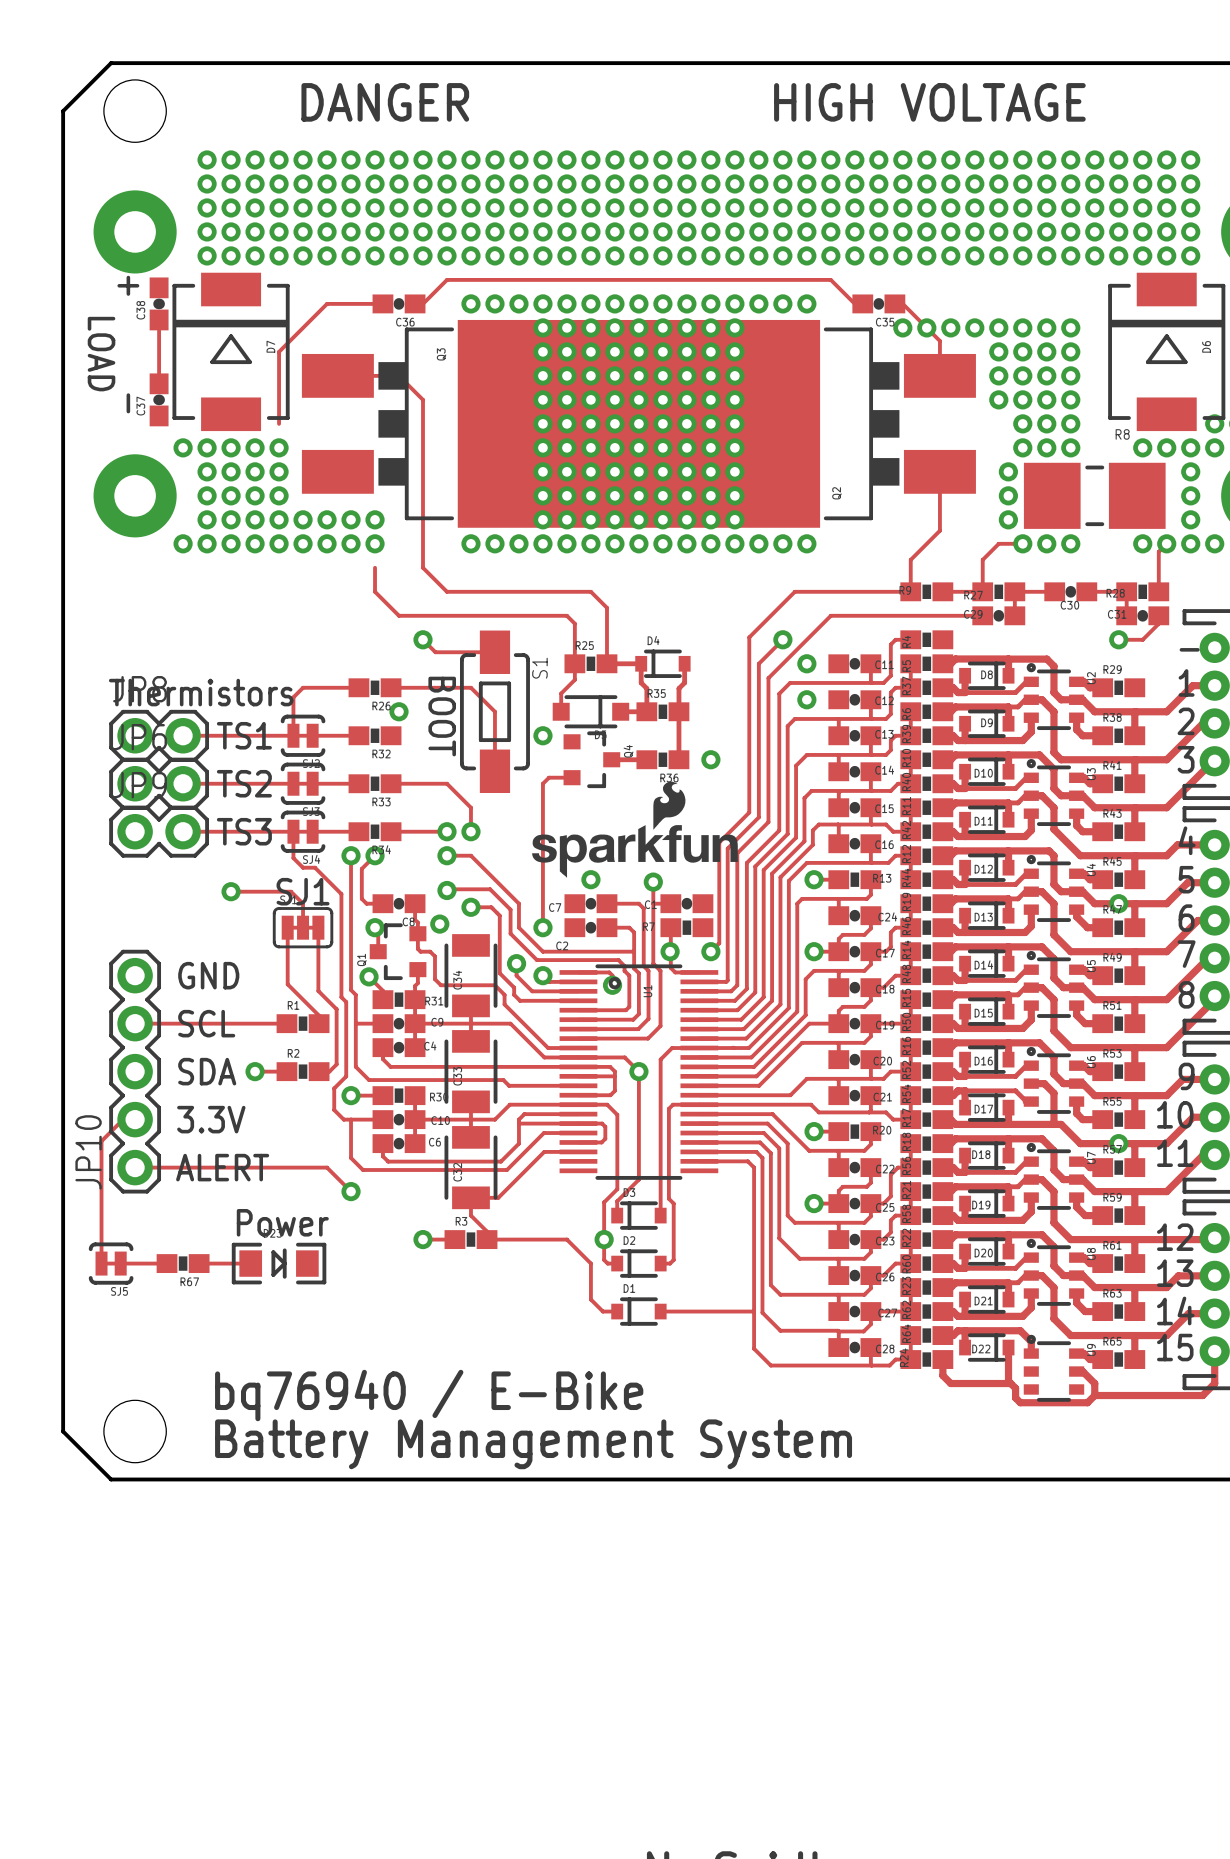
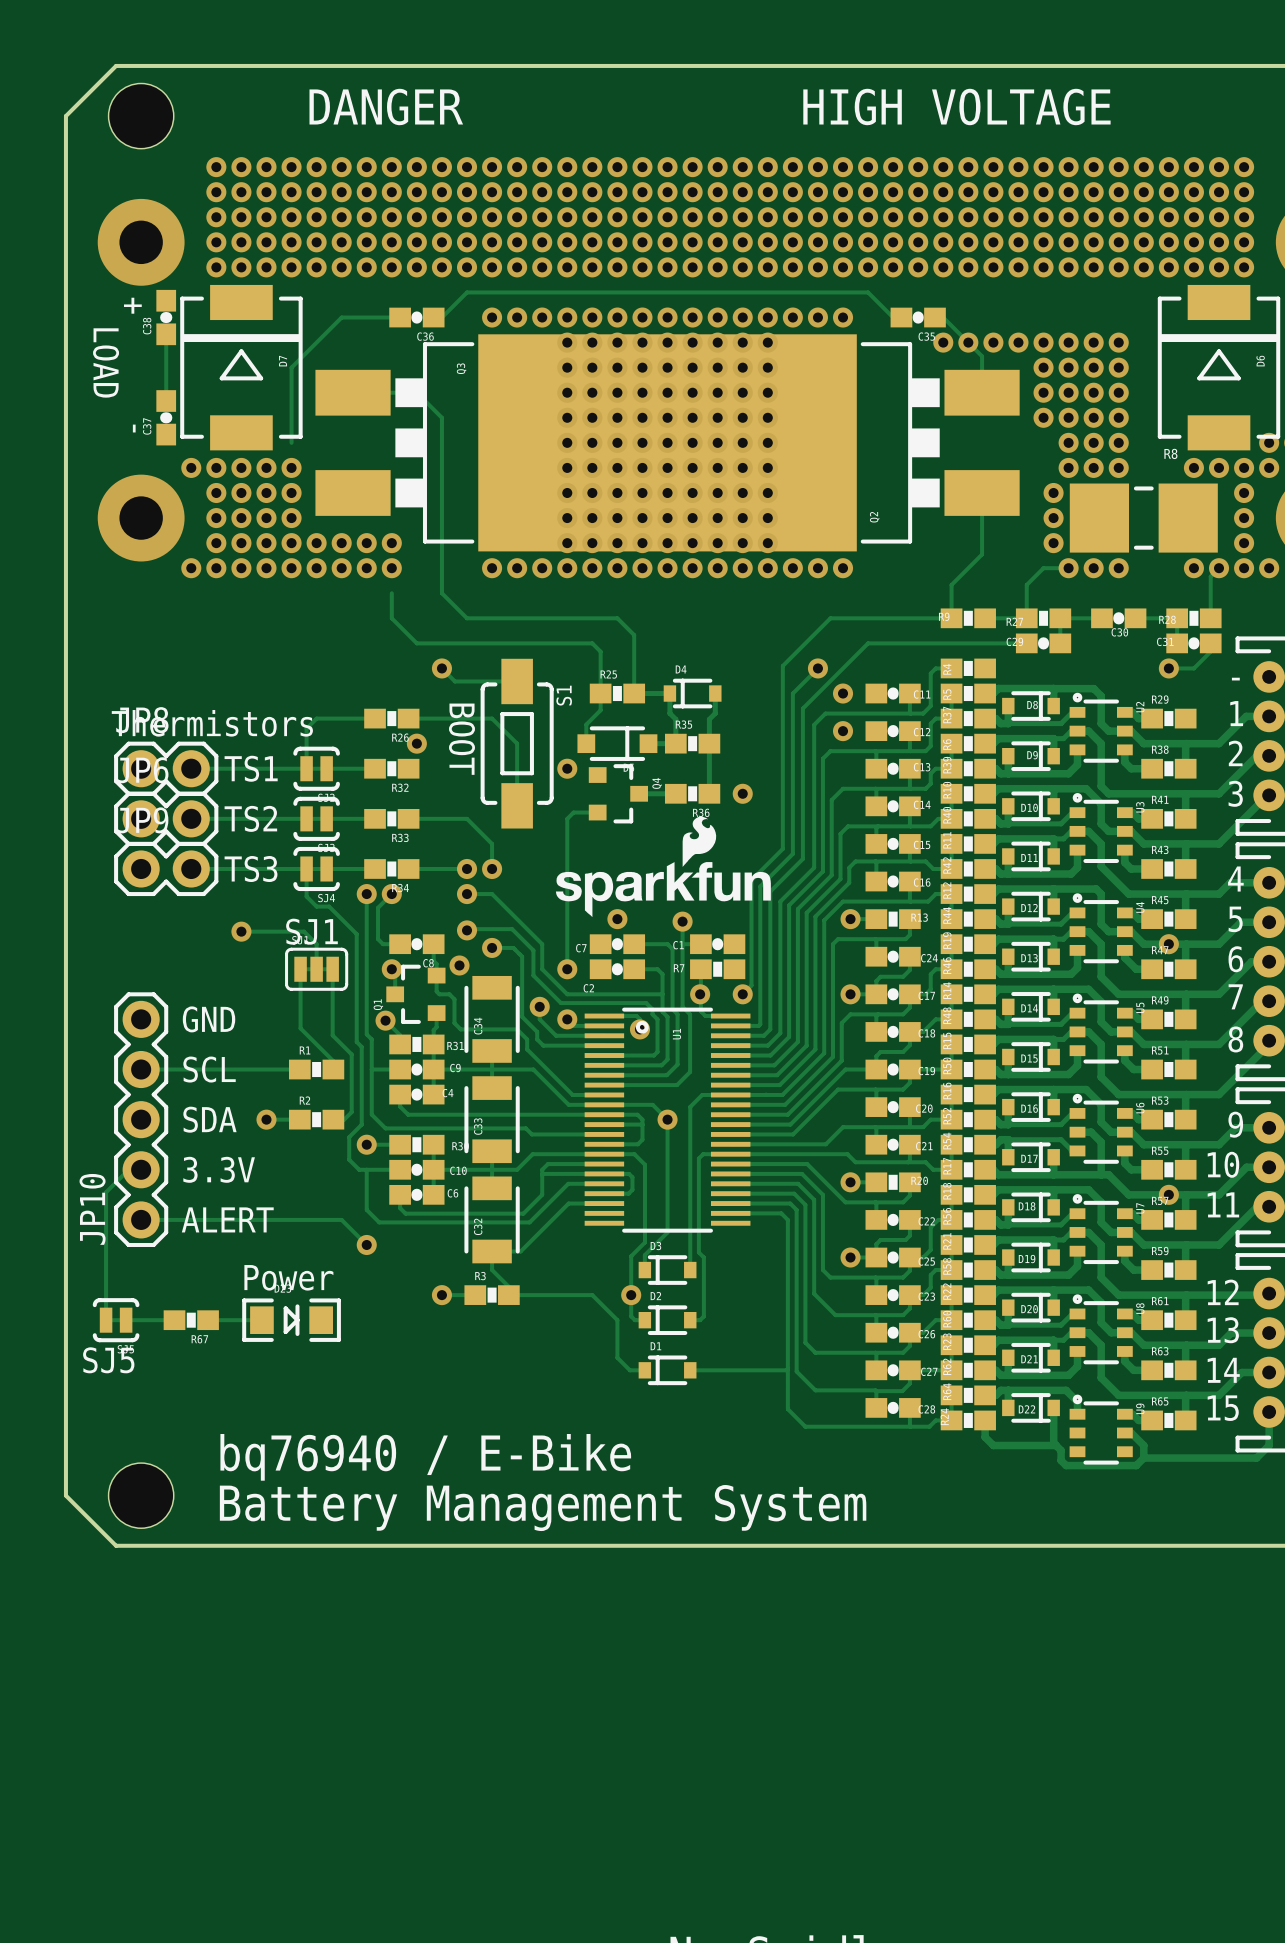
text: none -> SJ5 (108, 1360)

